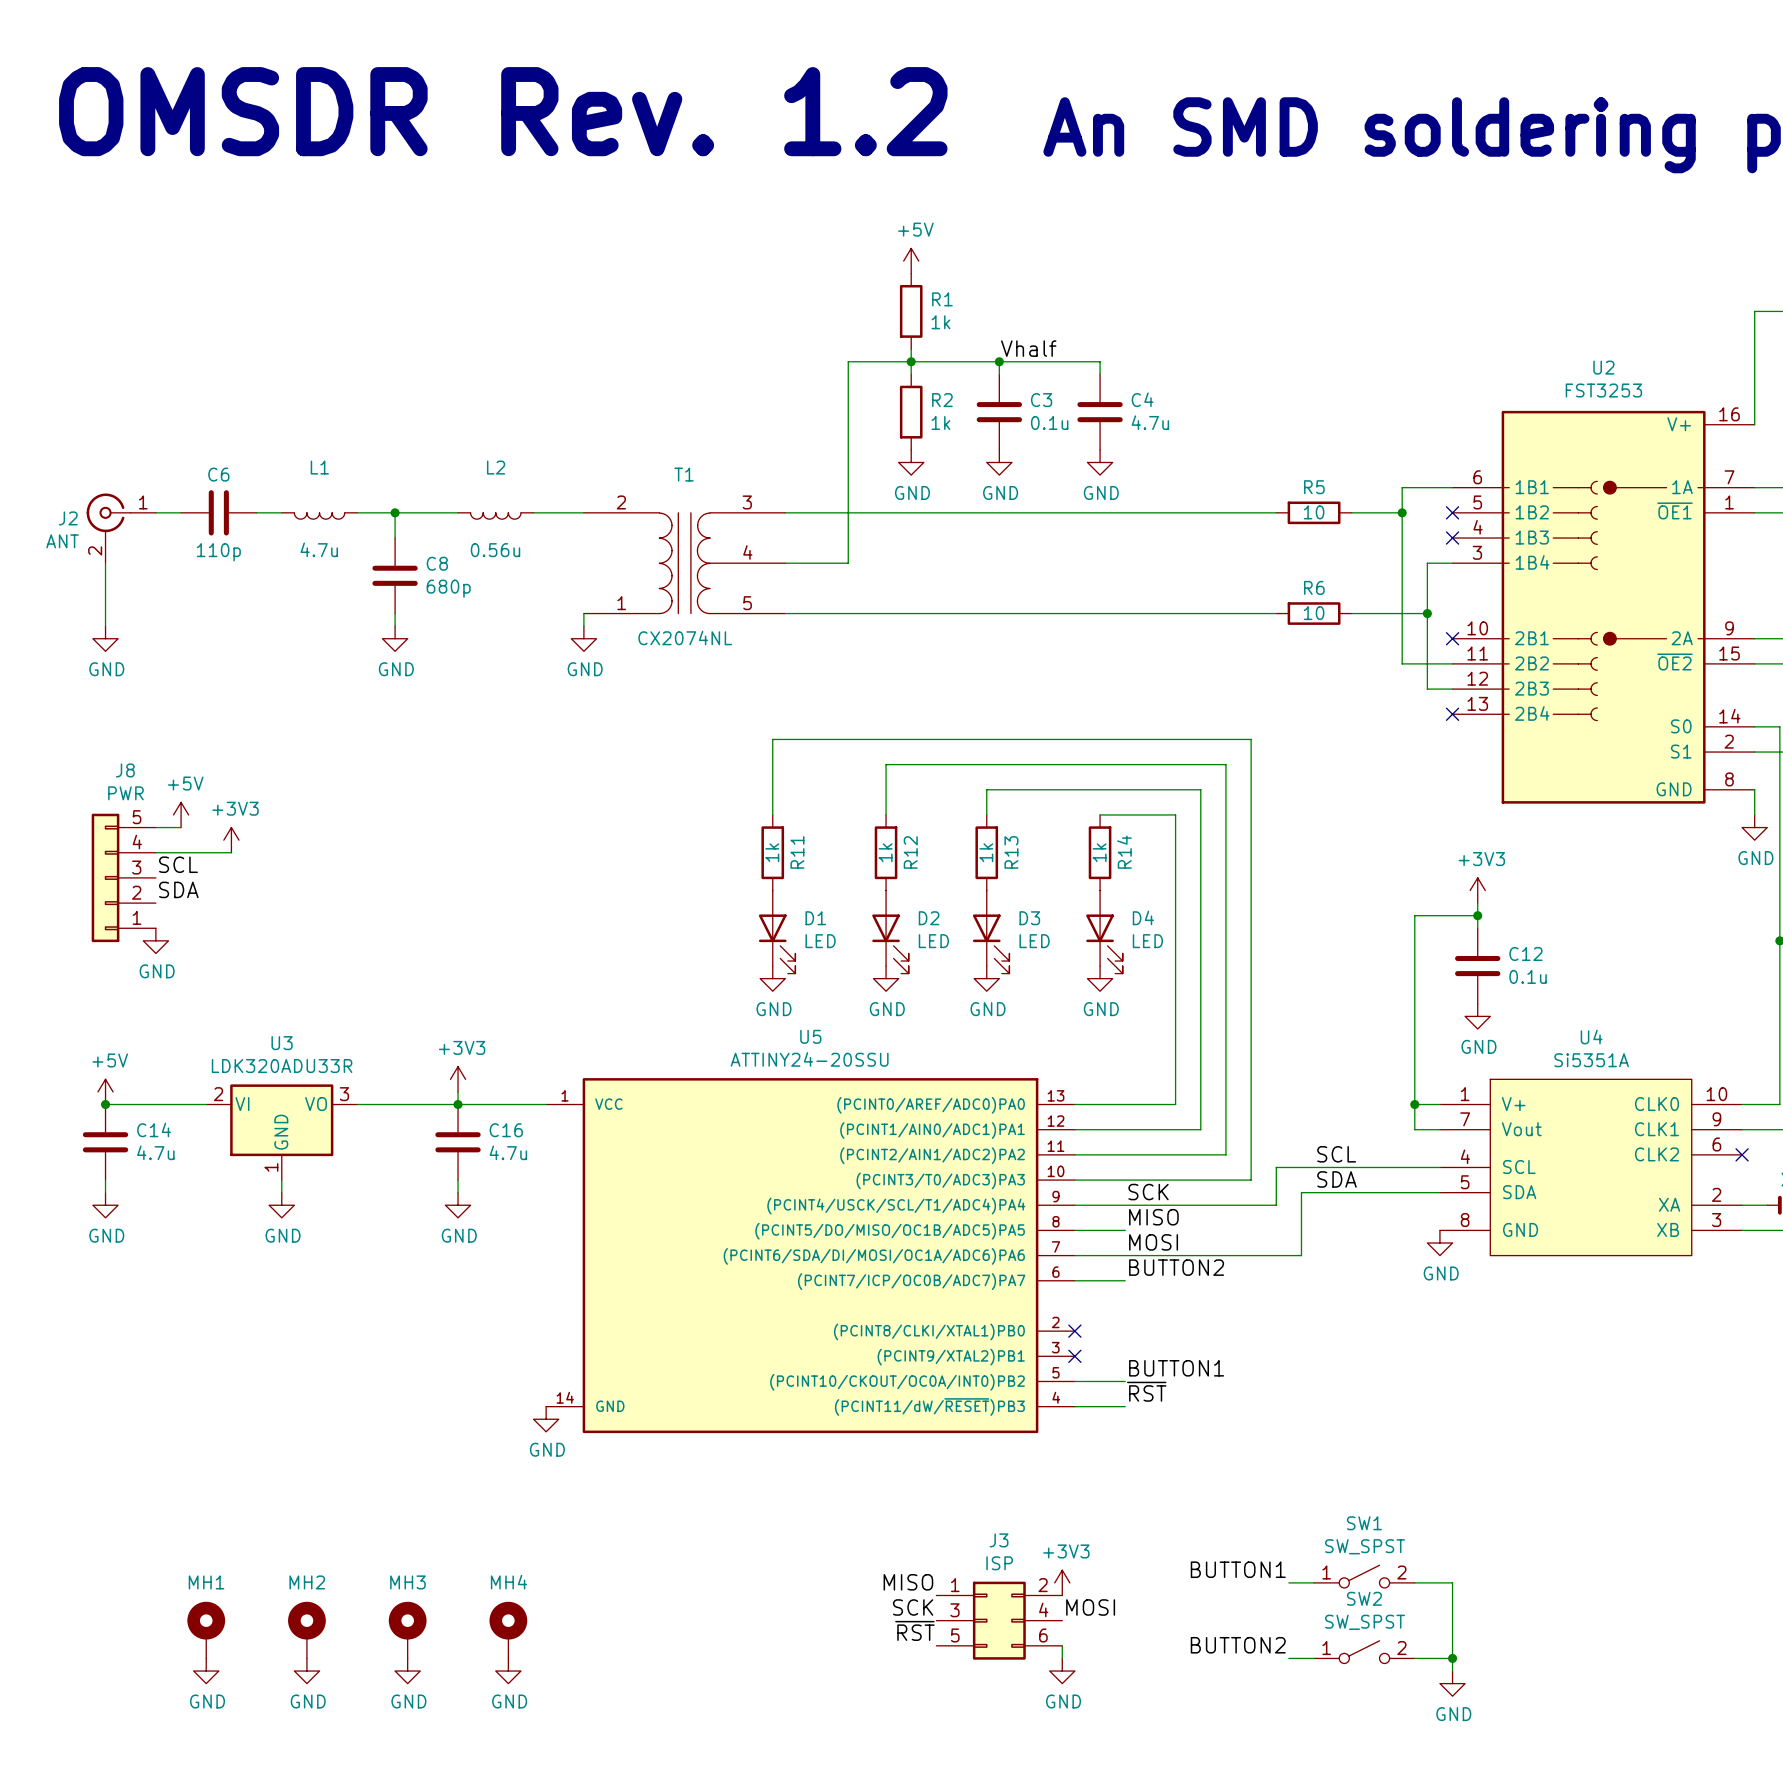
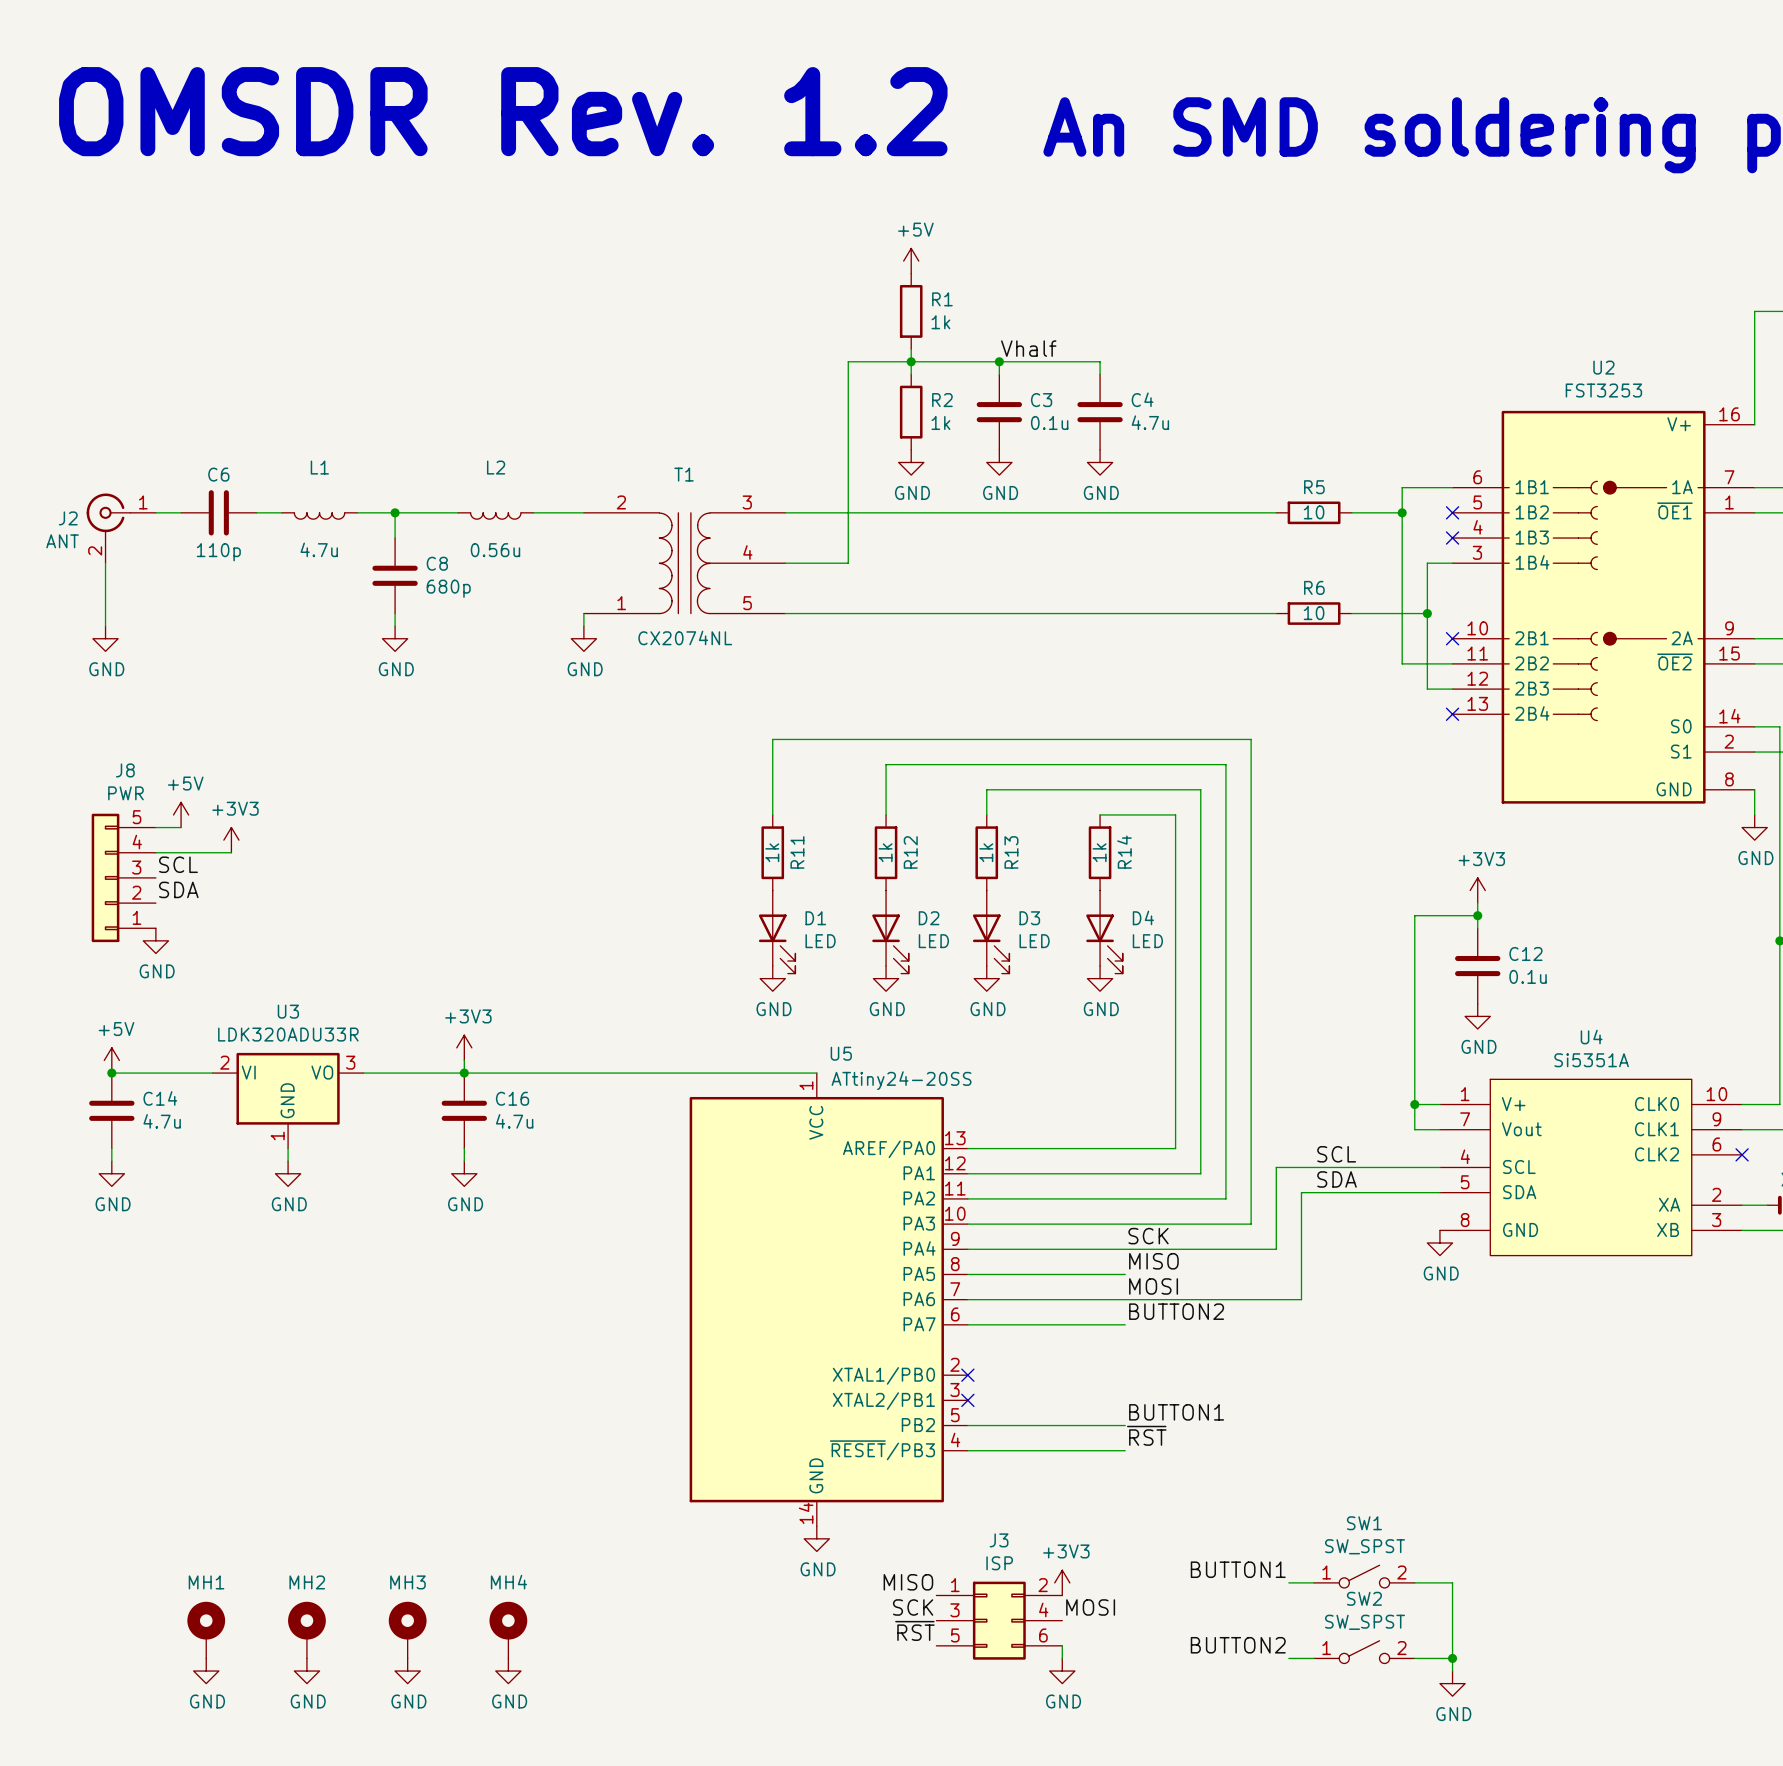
U5 name position: U5 (810, 1036) -> U5 (841, 1053)
U5 value: ATTINY24-20SSU (809, 1059) -> ATtiny24-20SS (901, 1080)
wire: none -> (363, 1073) (816, 1073)
U5 symbol: [546, 1078, 1075, 1434] -> [689, 1073, 968, 1527]
power symbol position: +3V3 (458, 1079) -> +3V3 (464, 1047)
power symbol position: +5V (105, 1091) -> +5V (111, 1060)
wire: (458, 1091) (458, 1104) -> (464, 1060) (464, 1073)
wire: (105, 1104) (206, 1104) -> (111, 1073) (212, 1073)
junction position: (105, 1104) -> (111, 1073)
wire: (357, 1104) (546, 1104) -> none
junction position: (458, 1104) -> (464, 1073)
wire: (1074, 1104) (1175, 1104) -> (967, 1148) (1175, 1148) (1175, 1104)
wire: (1074, 1129) (1200, 1129) -> (967, 1173) (1200, 1173) (1200, 1129)
U3 position: (281, 1132) -> (288, 1100)
C14 position: (105, 1142) -> (111, 1110)
C16 position: (458, 1142) -> (464, 1110)
wire: (1074, 1154) (1225, 1154) -> (967, 1198) (1225, 1198) (1225, 1154)
wire: (105, 1180) (105, 1192) -> (111, 1148) (111, 1161)
wire: (458, 1180) (458, 1192) -> (464, 1148) (464, 1161)
wire: (1074, 1180) (1251, 1180) -> (967, 1224) (1251, 1224) (1251, 1180)
label position: SCK (1148, 1192) -> SCK (1148, 1236)
power symbol position: GND (105, 1205) -> GND (111, 1173)
power symbol position: GND (281, 1205) -> GND (288, 1173)
power symbol position: GND (458, 1205) -> GND (464, 1173)
wire: (1074, 1205) (1276, 1205) -> (967, 1249) (1276, 1249) (1276, 1205)
label position: MISO (1153, 1217) -> MISO (1153, 1261)
wire: (1074, 1230) (1125, 1230) -> none
label position: MOSI (1153, 1242) -> MOSI (1153, 1286)
wire: (1074, 1255) (1301, 1255) -> (967, 1299) (1301, 1299) (1301, 1255)
label position: BUTTON2 (1176, 1267) -> BUTTON2 (1176, 1311)
wire: none -> (967, 1274) (1125, 1274)
wire: (1074, 1280) (1125, 1280) -> none
wire: none -> (967, 1324) (1125, 1324)
no-connect mark: (1074, 1331) -> none
no-connect mark: (1074, 1356) -> none
label position: BUTTON1 (1176, 1368) -> BUTTON1 (1176, 1412)
no-connect mark: none -> (967, 1375)
wire: (1074, 1381) (1125, 1381) -> none
label position: ~{RST} (1146, 1391) -> ~{RST} (1146, 1435)
no-connect mark: none -> (967, 1400)
wire: (1074, 1406) (1125, 1406) -> none
power symbol: GND (546, 1419) -> none
wire: none -> (967, 1425) (1125, 1425)
wire: none -> (967, 1450) (1125, 1450)
power symbol: none -> GND (816, 1538)

